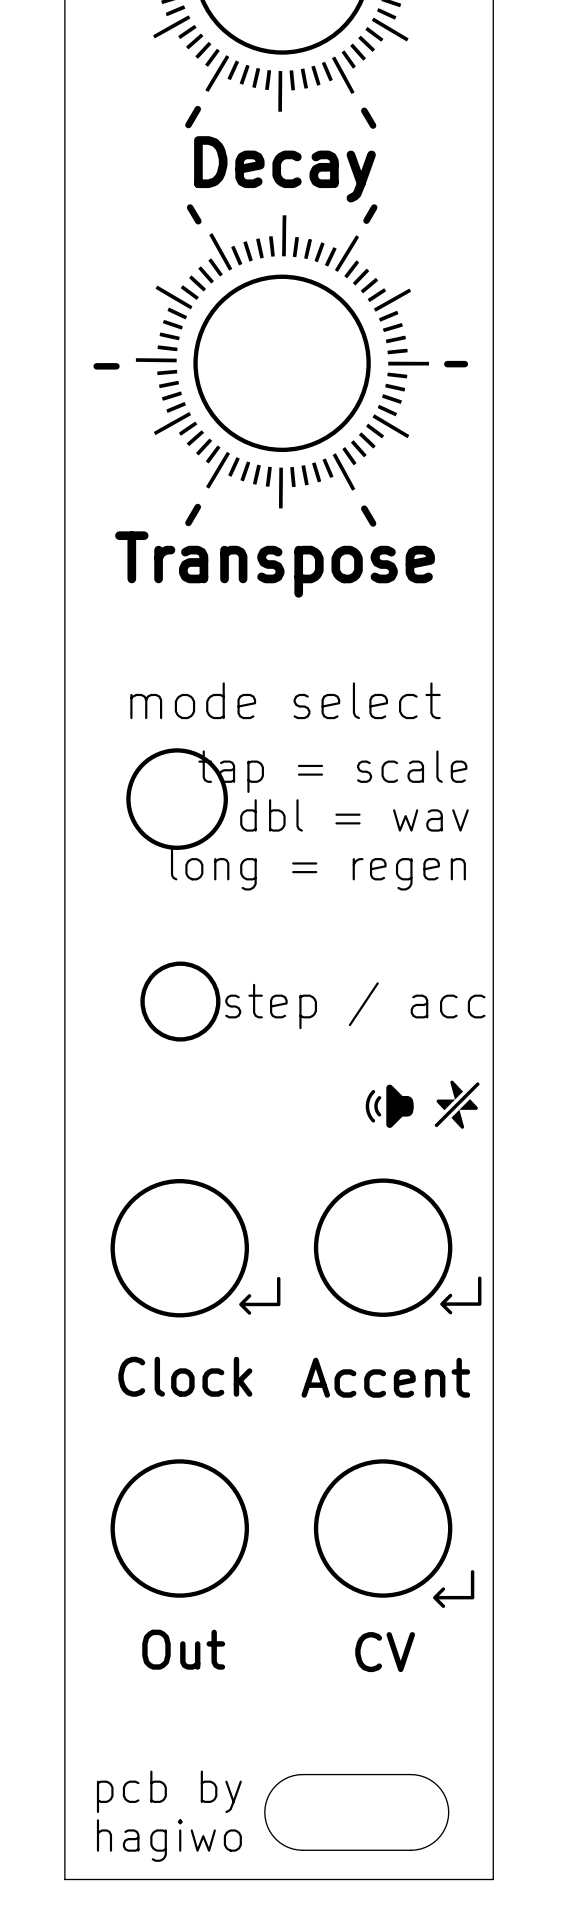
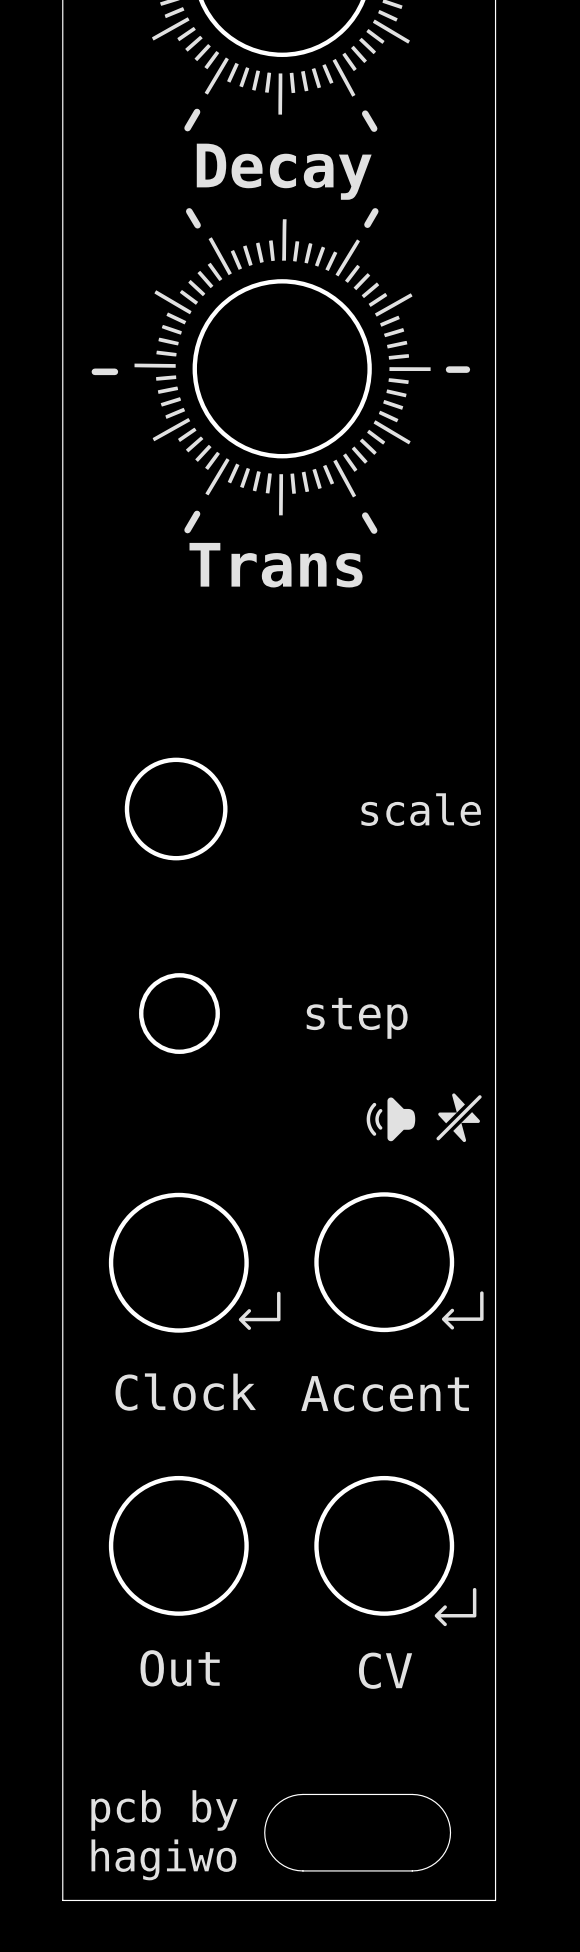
text: Transpose (275, 564) -> Trans (276, 565)
text: mode select (285, 700) -> none
text: tap = scale (332, 771) -> scale (421, 809)
text: dbl = wav (354, 815) -> none
text: long = regen (318, 869) -> none
text: step / acc (355, 1005) -> step (357, 1018)

